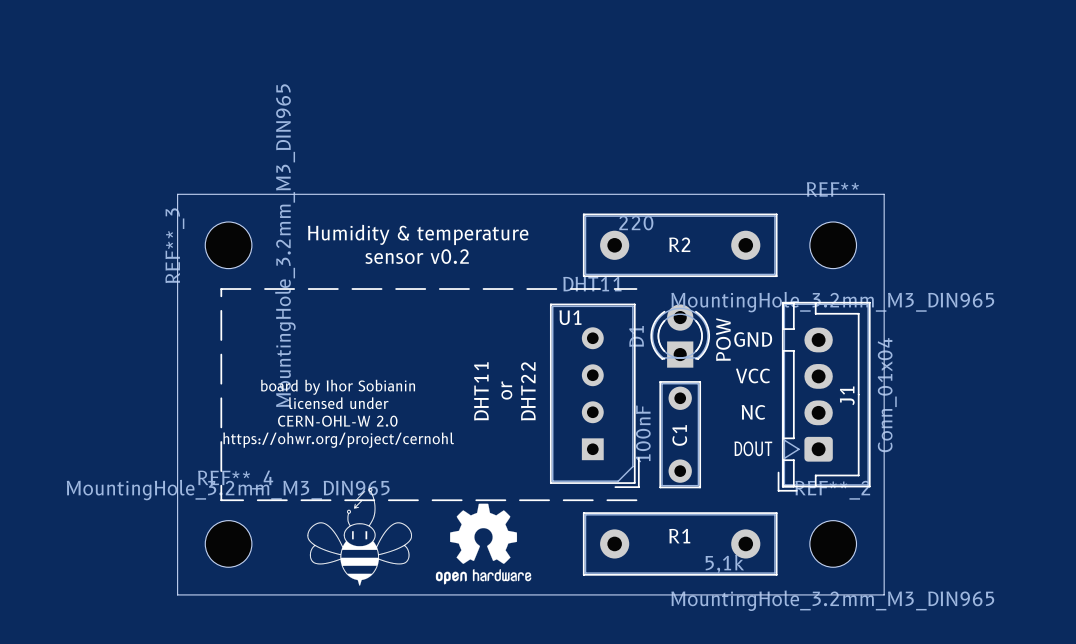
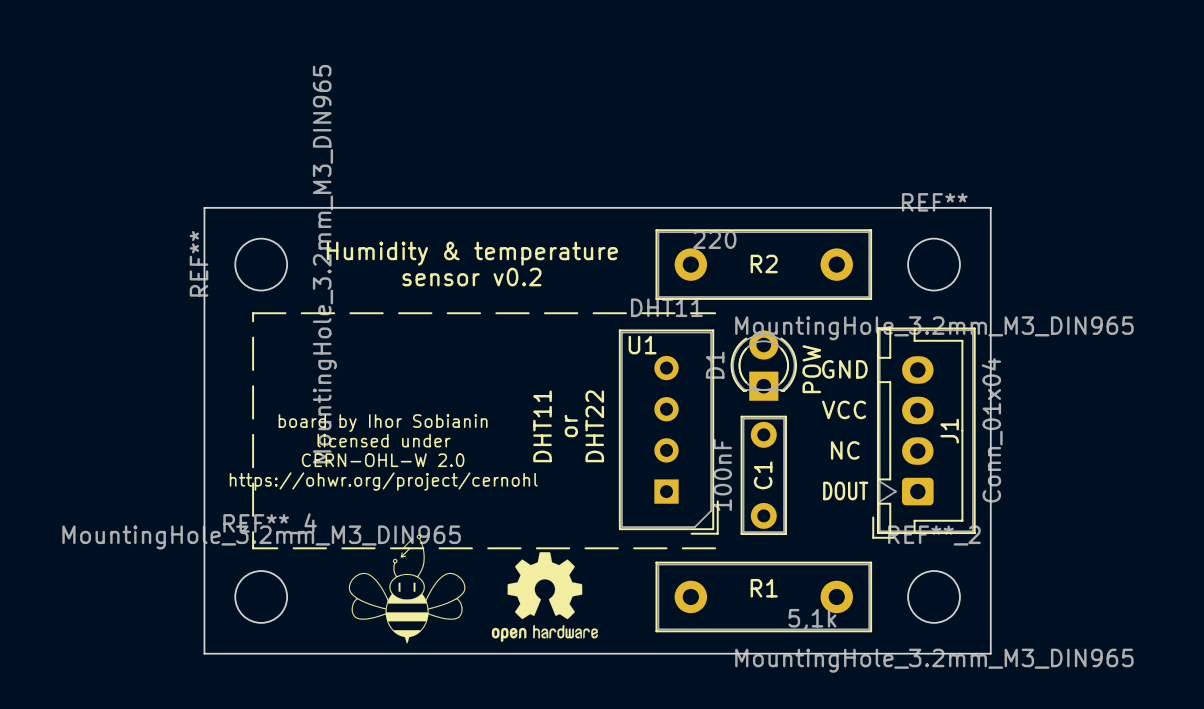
REF**_3 name: REF**_3 (174, 245) -> REF** (198, 263)

